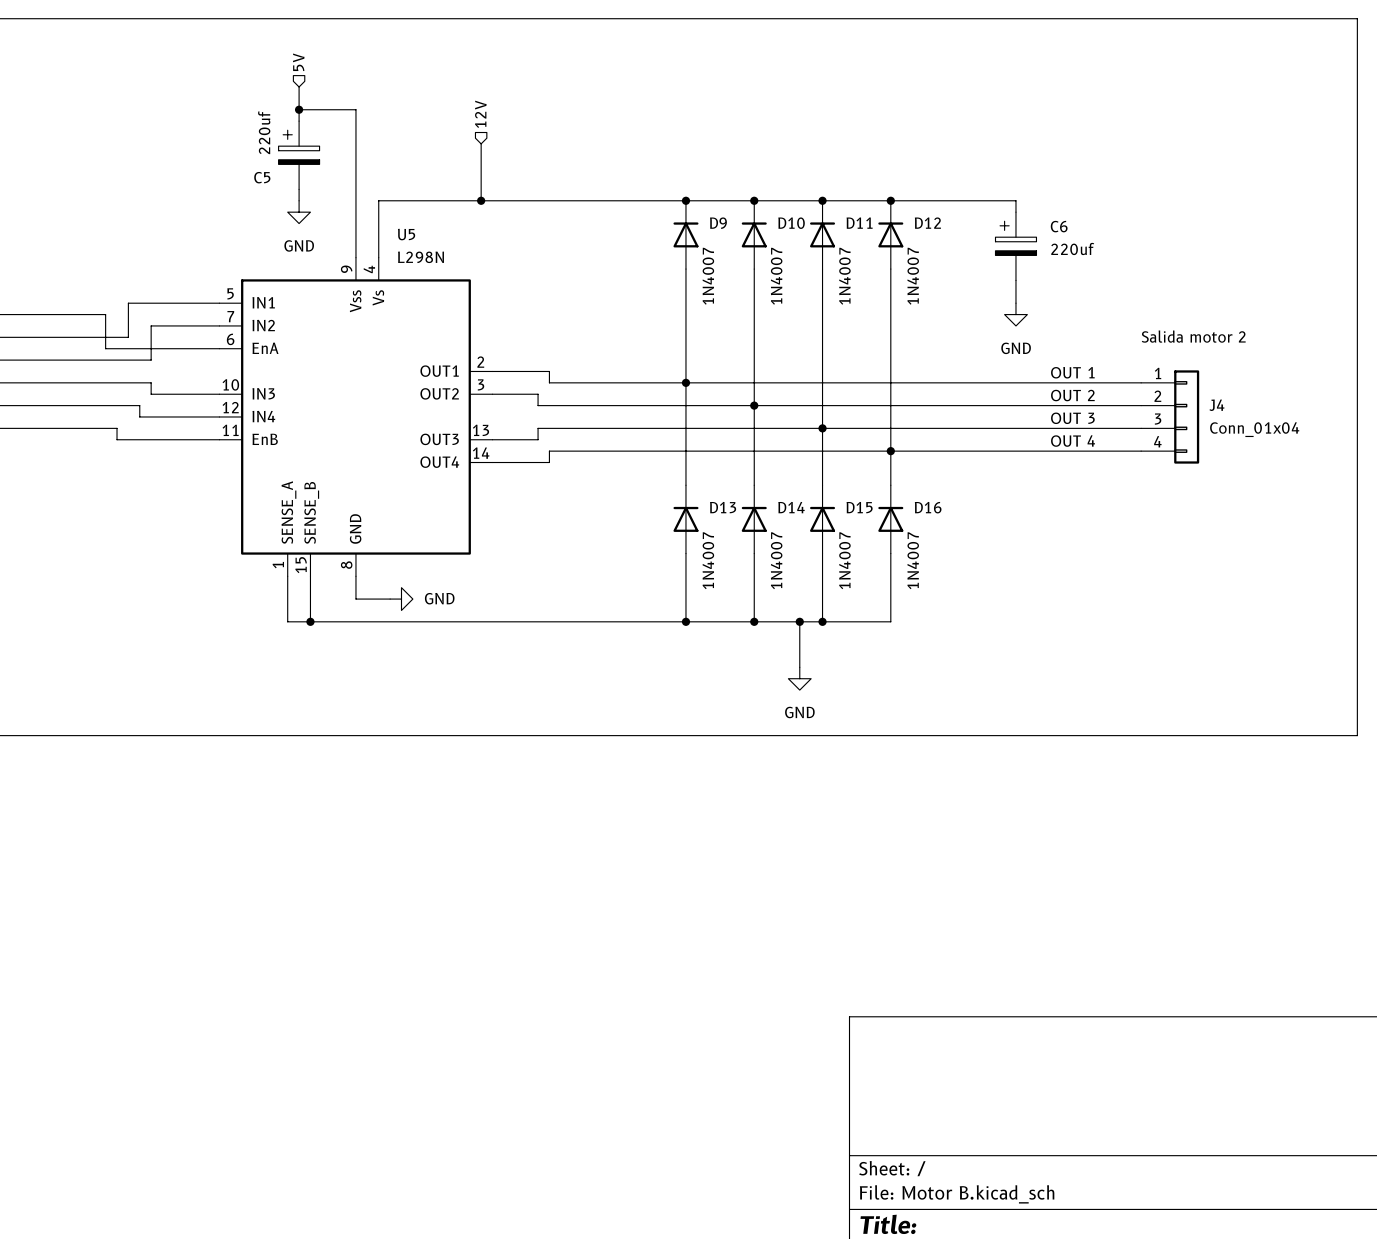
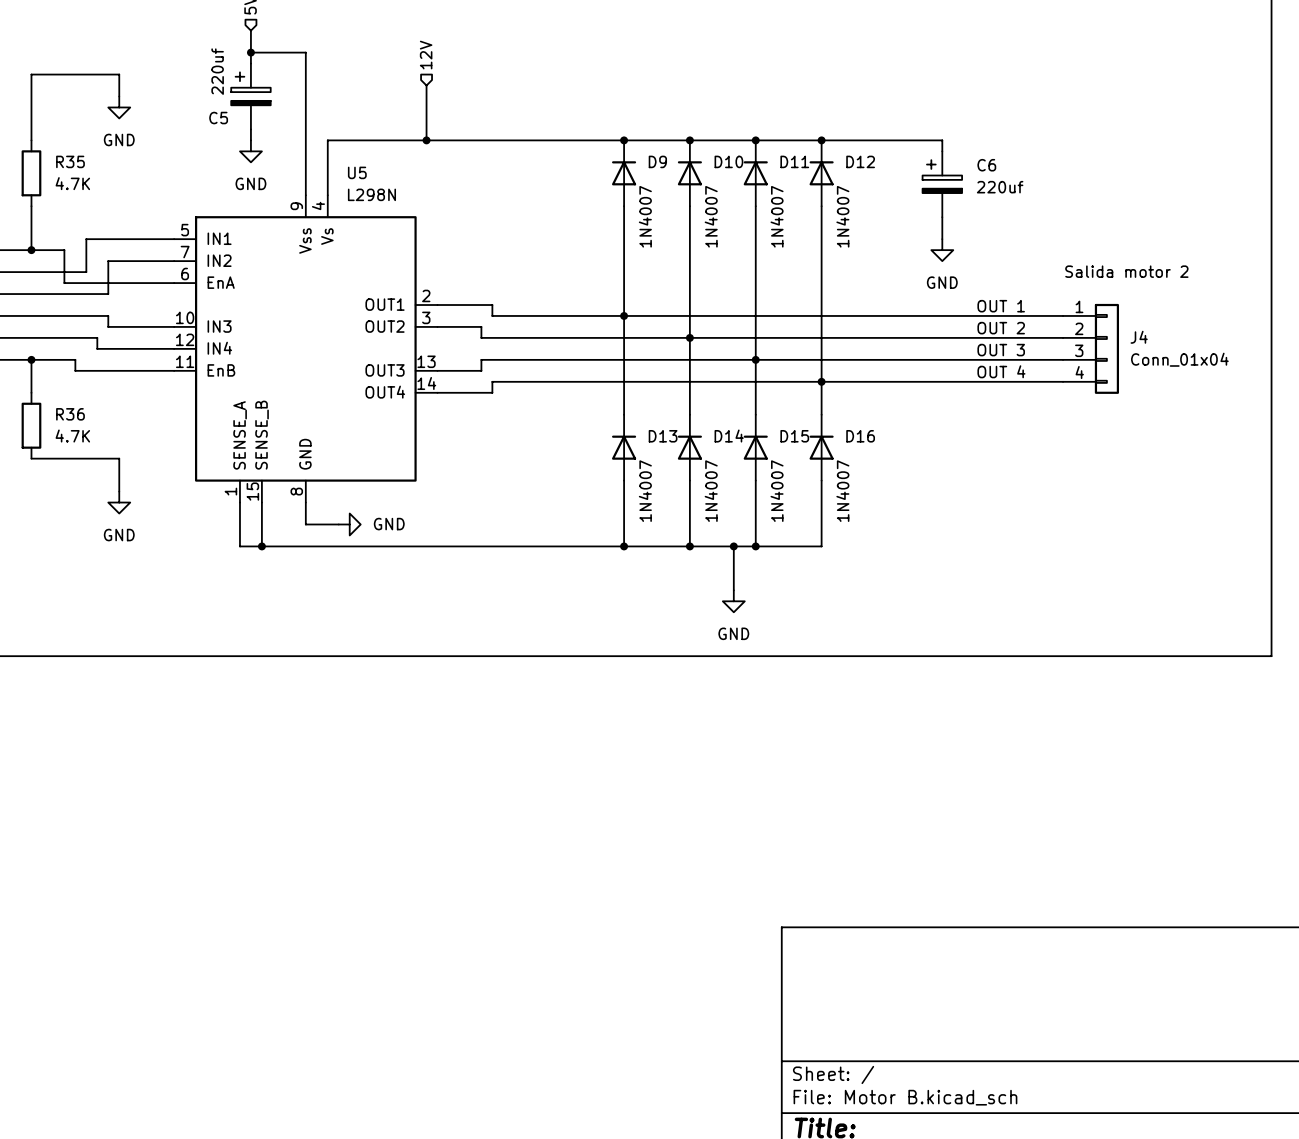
wire: none -> (119, 96) (119, 74) (31, 74) (31, 140)
power symbol: none -> GND (119, 107)
R35: none -> 4.7K (31, 173)
wire: none -> (31, 206) (31, 250)
junction: none -> (31, 250)
wire: none -> (31, 359) (31, 392)
junction: none -> (31, 359)
R36: none -> 4.7K (31, 425)
wire: none -> (31, 458) (119, 458) (119, 491)
power symbol: none -> GND (119, 502)

